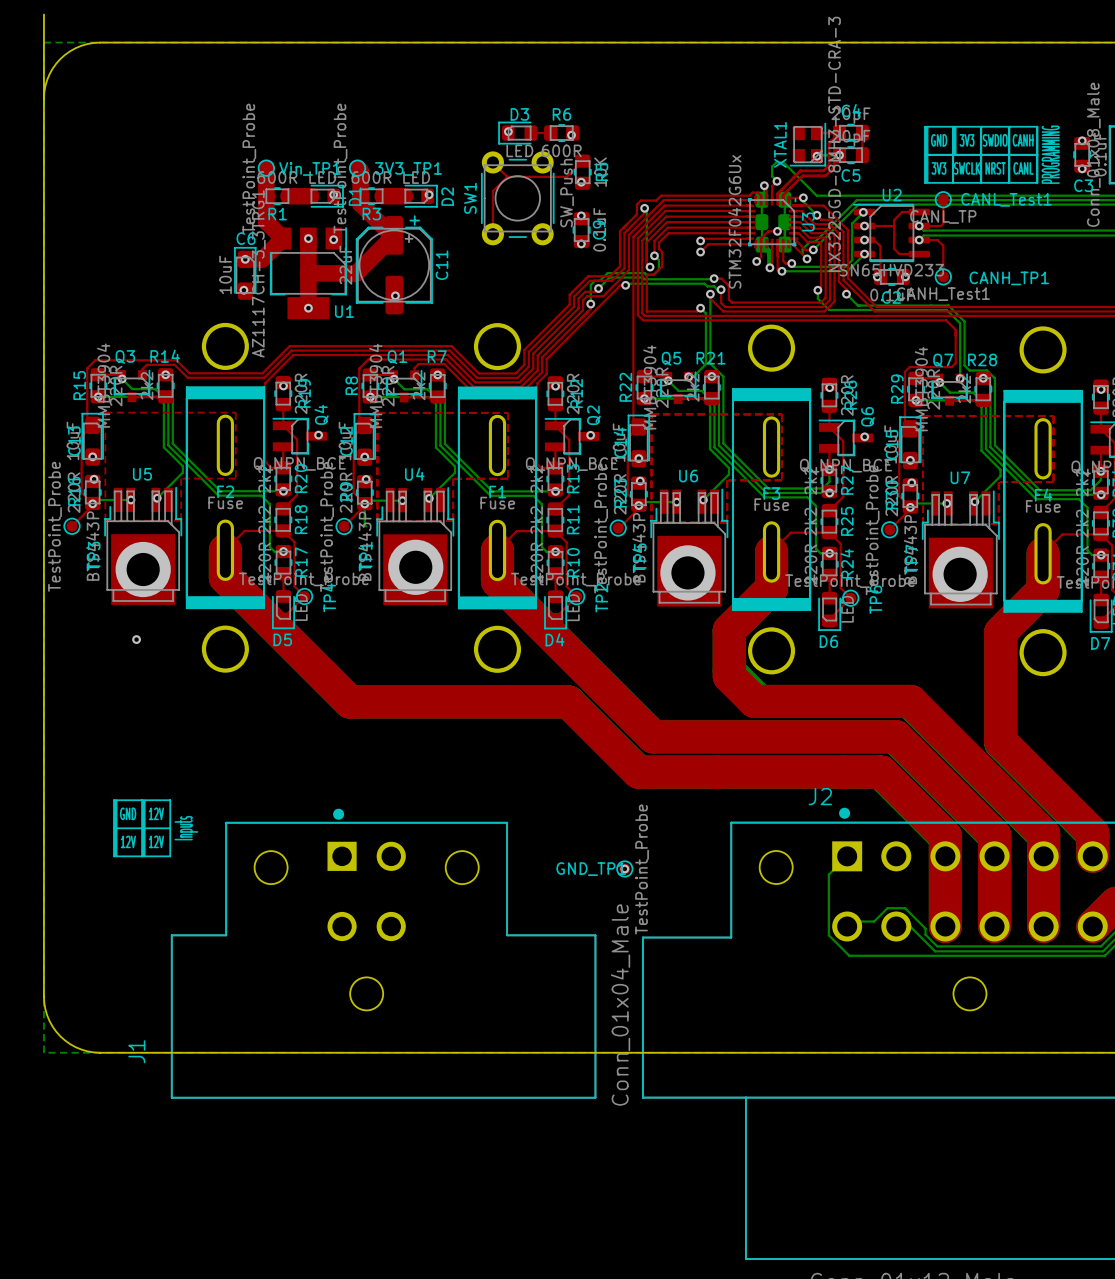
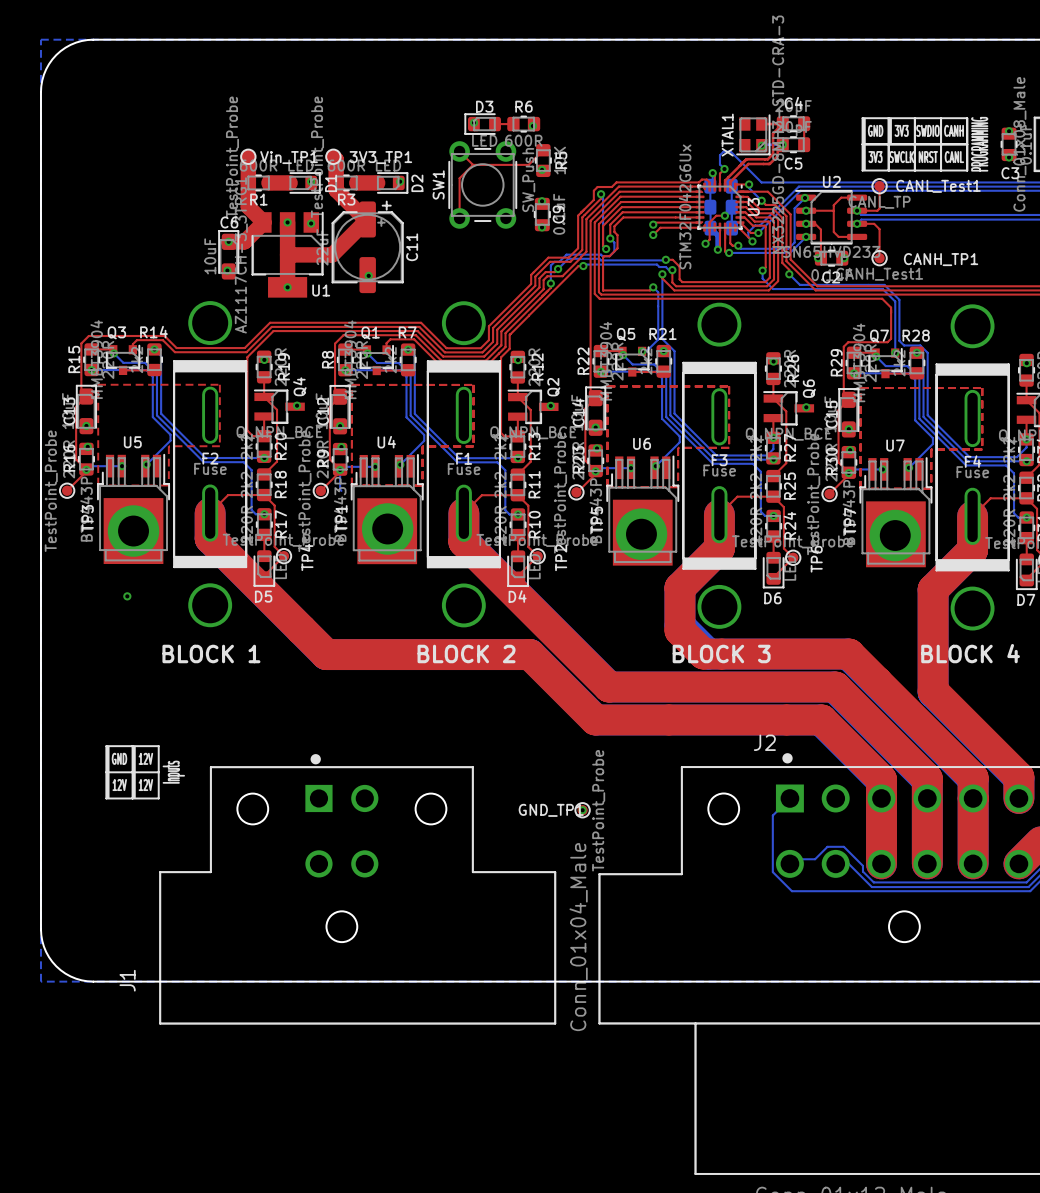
board edge: (43, 14) (43, 98) -> none
text: none -> BLOCK 4 (970, 653)
text: none -> BLOCK 1 (211, 653)
text: none -> BLOCK 2 (466, 653)
text: none -> BLOCK 3 (721, 653)

